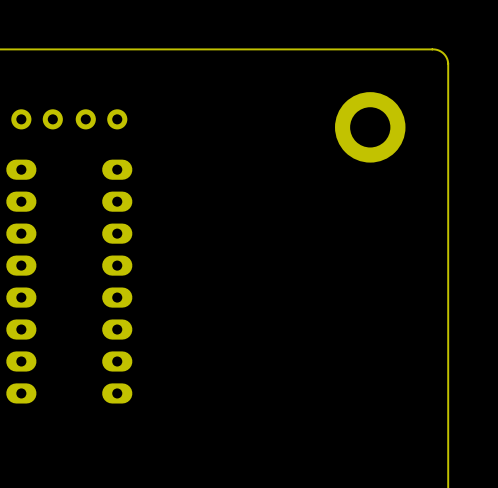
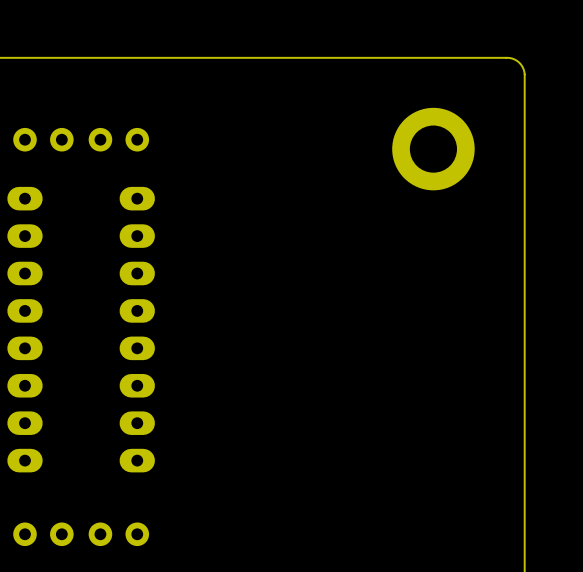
part: none -> (43, 534)
part: none -> (118, 534)

